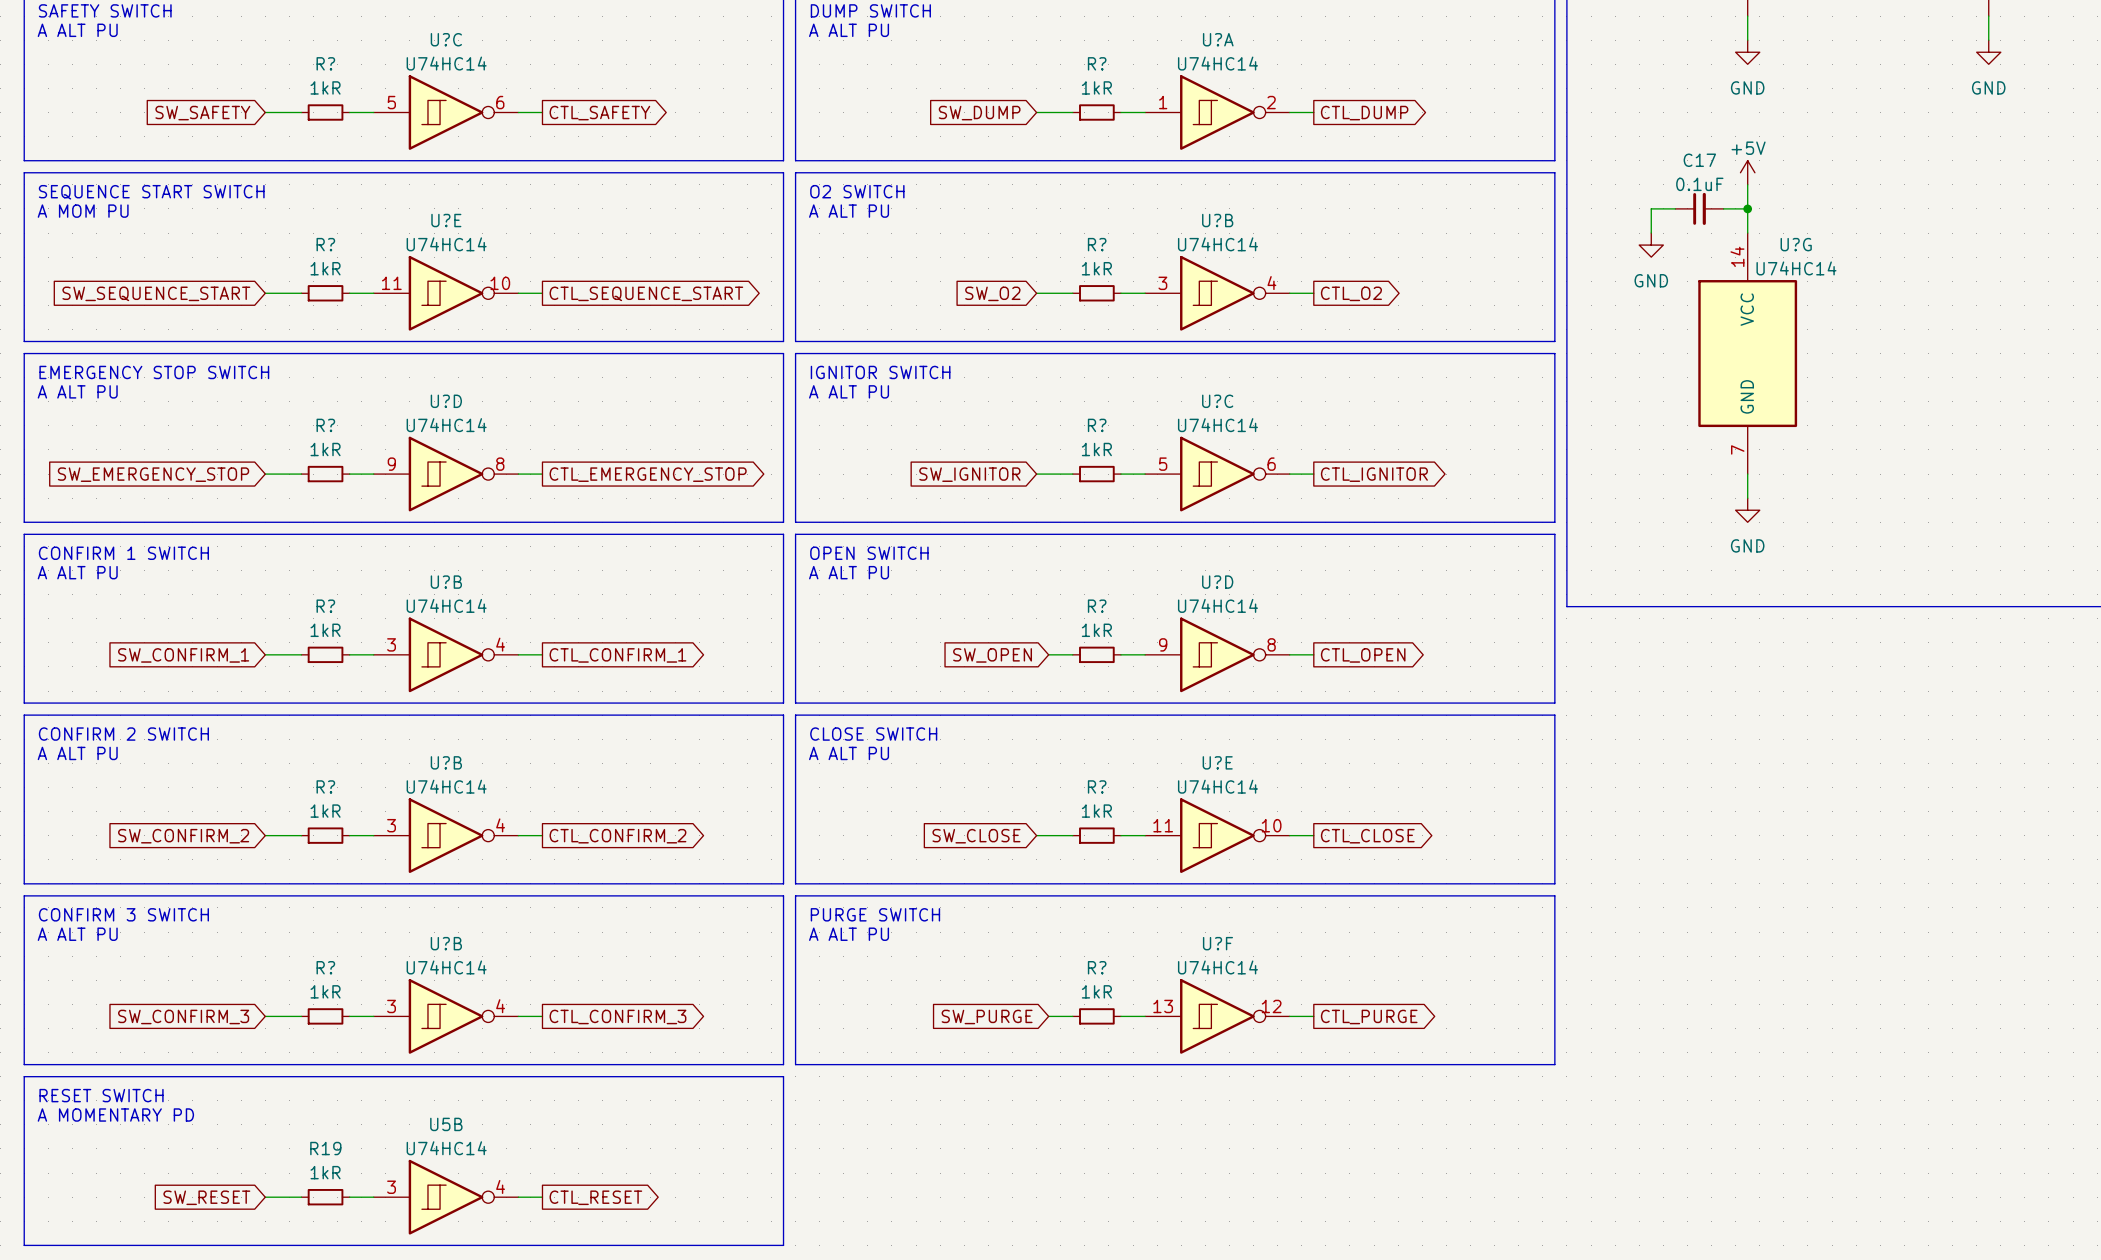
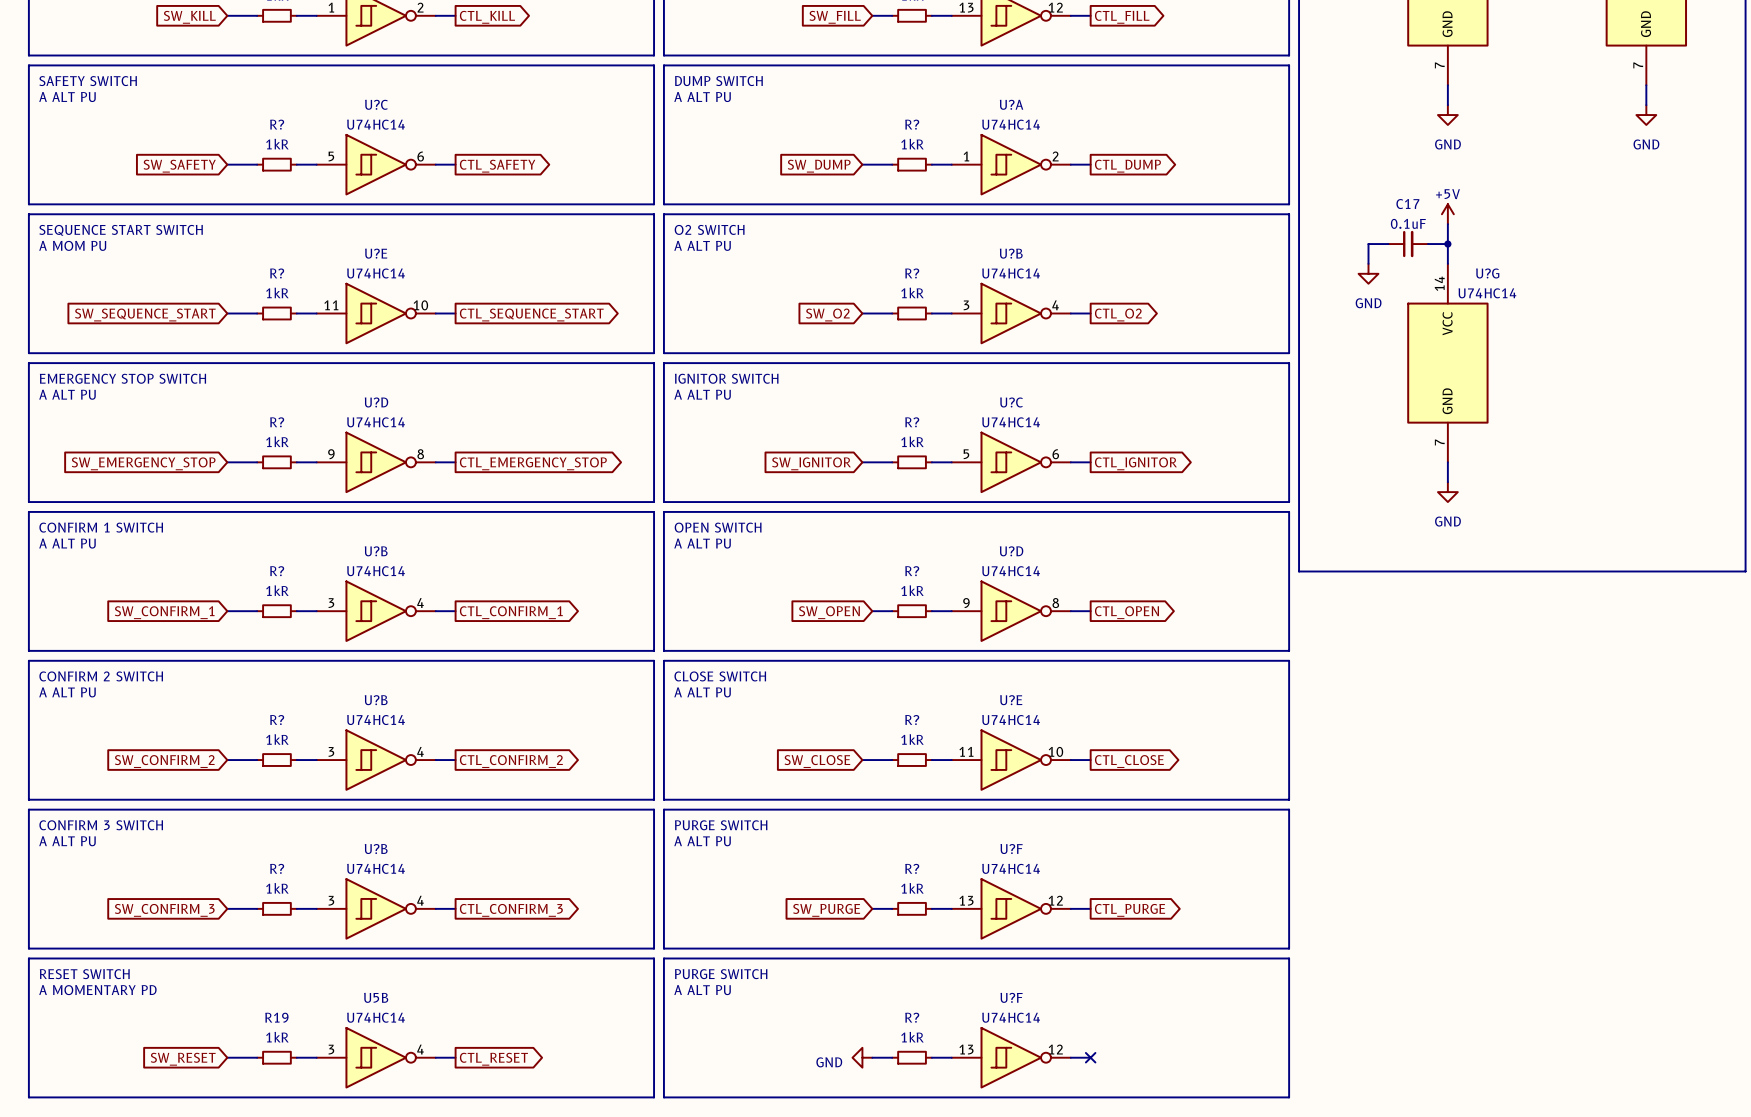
line: none -> (663, 958) (1289, 958) (1289, 1097) (663, 1097) (663, 958)
text: none -> PURGE SWITCH (721, 974)
text: none -> A ALT PU (702, 990)
power symbol: none -> GND (862, 1057)
wire: none -> (872, 1057) (892, 1057)
R?: none -> 1kR (912, 1057)
wire: none -> (931, 1057) (951, 1057)
U?F: none -> U74HC14 (1011, 1057)
wire: none -> (1070, 1057) (1090, 1057)
no-connect mark: none -> (1090, 1057)

